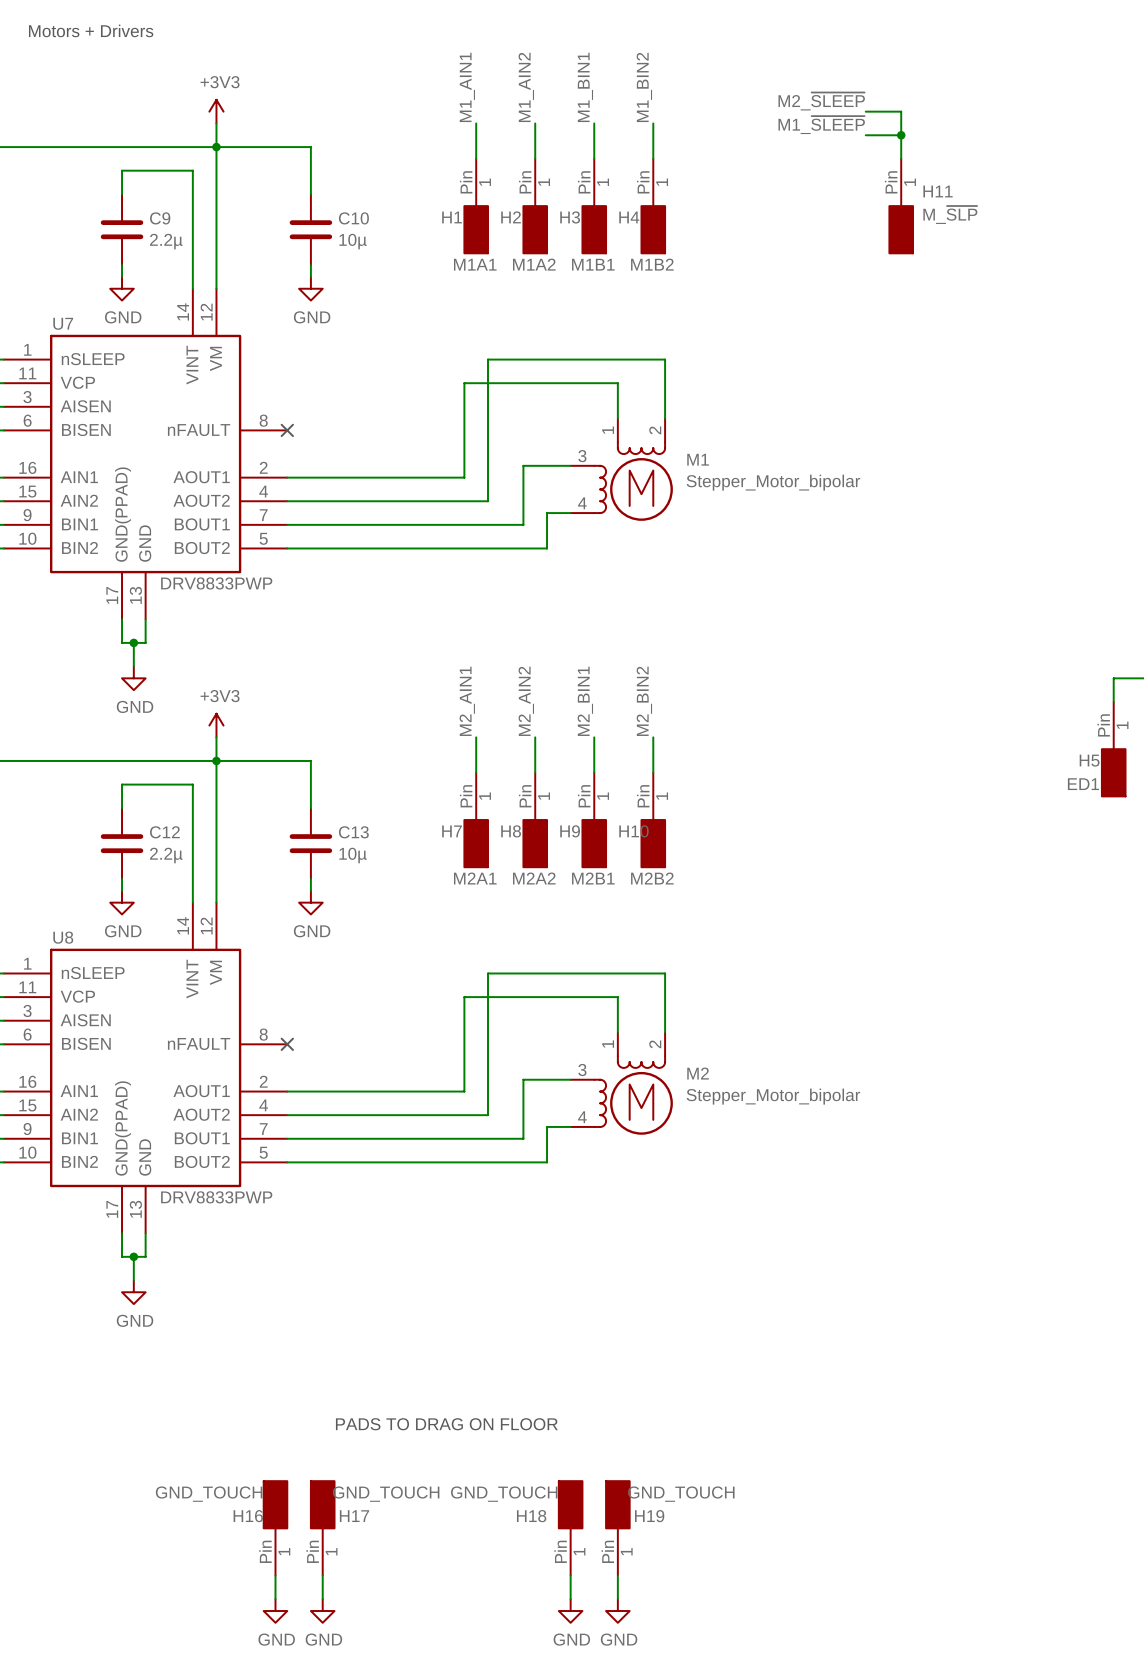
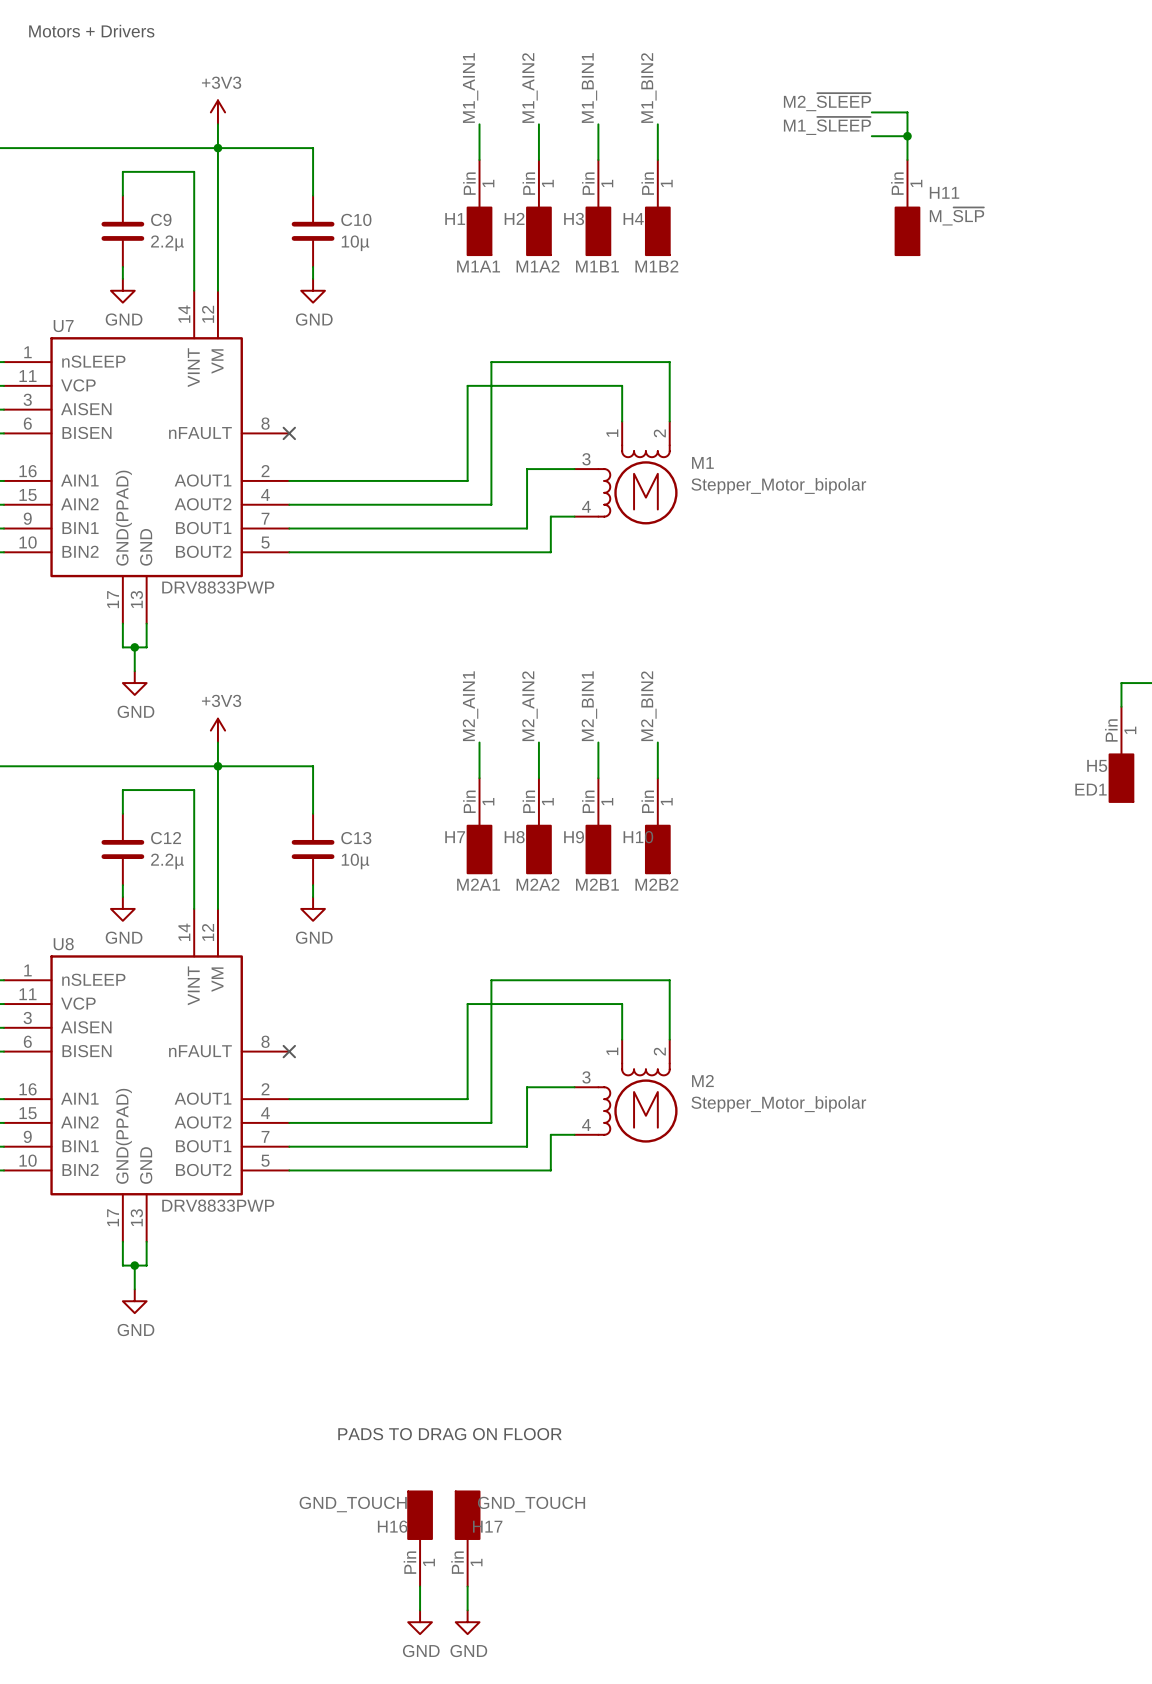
H17 name position: H17 (354, 1516) -> H17 (487, 1526)
H16 position: (275, 1528) -> (420, 1539)
H17 position: (322, 1528) -> (467, 1539)
H18: GND_TOUCH (570, 1528) -> none
H19: GND_TOUCH (617, 1528) -> none
wire: (275, 1575) (275, 1599) -> (420, 1586) (420, 1610)
wire: (322, 1575) (322, 1599) -> (467, 1586) (467, 1610)
wire: (570, 1575) (570, 1599) -> none
wire: (617, 1575) (617, 1599) -> none
power symbol: GND (275, 1611) -> none
power symbol: GND (322, 1611) -> none
power symbol: none -> GND (420, 1622)
power symbol: none -> GND (467, 1622)
power symbol: GND (570, 1611) -> none
power symbol: GND (617, 1611) -> none

